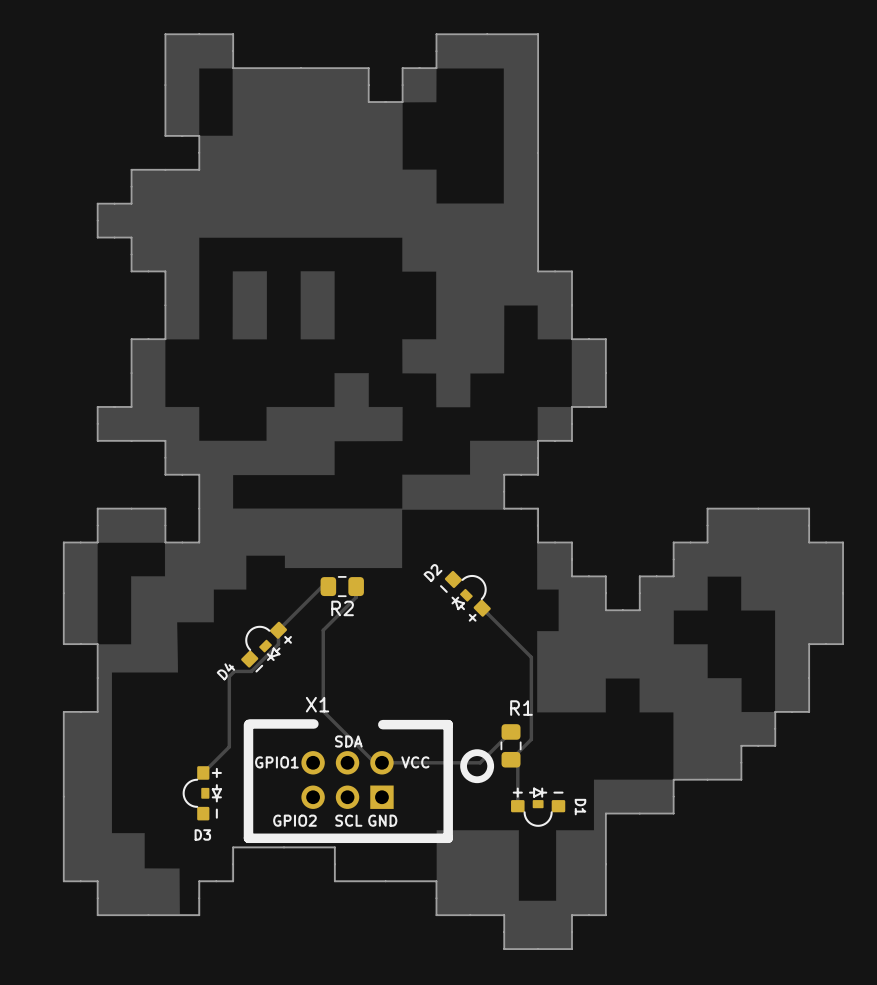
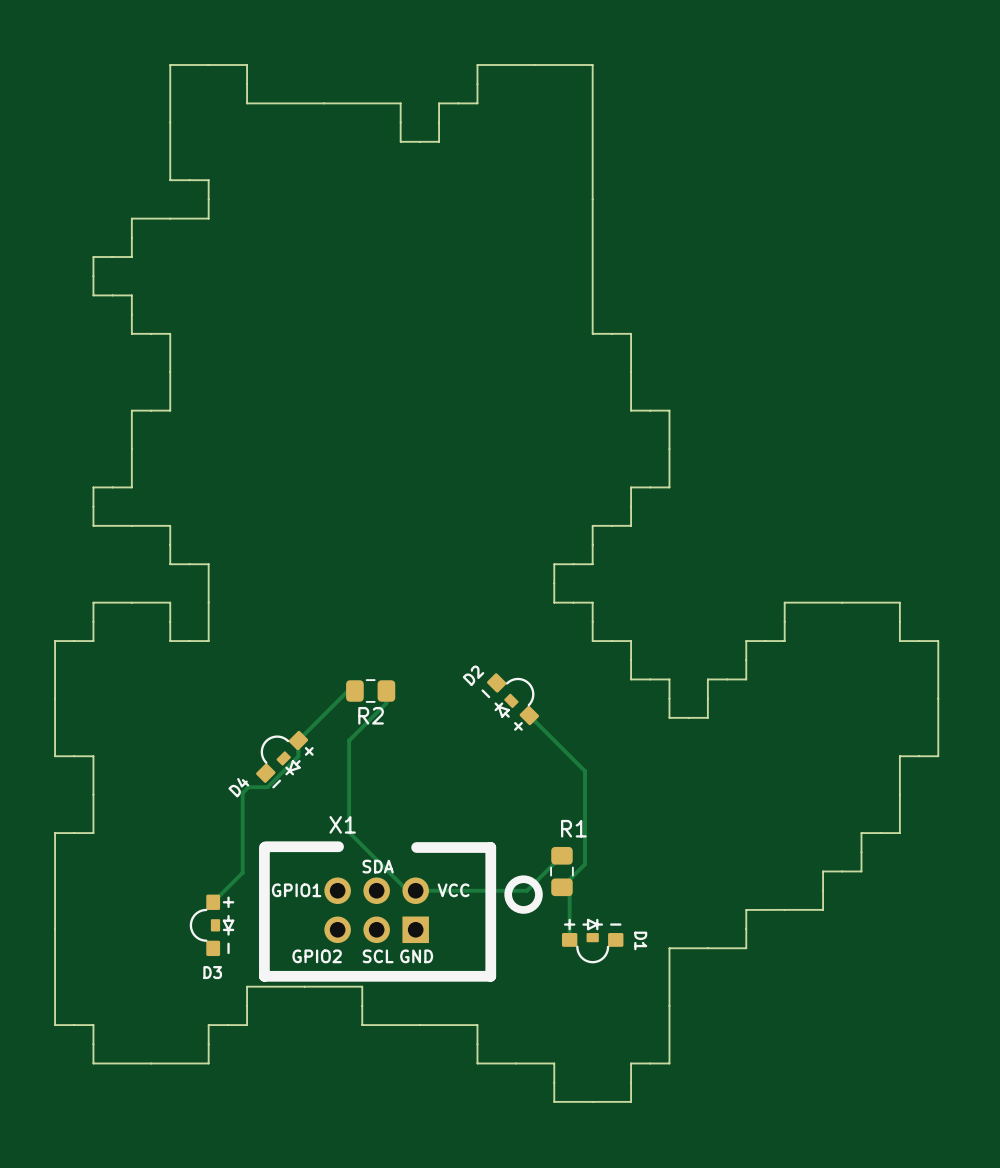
drawing: [63, 34, 844, 950] -> none

